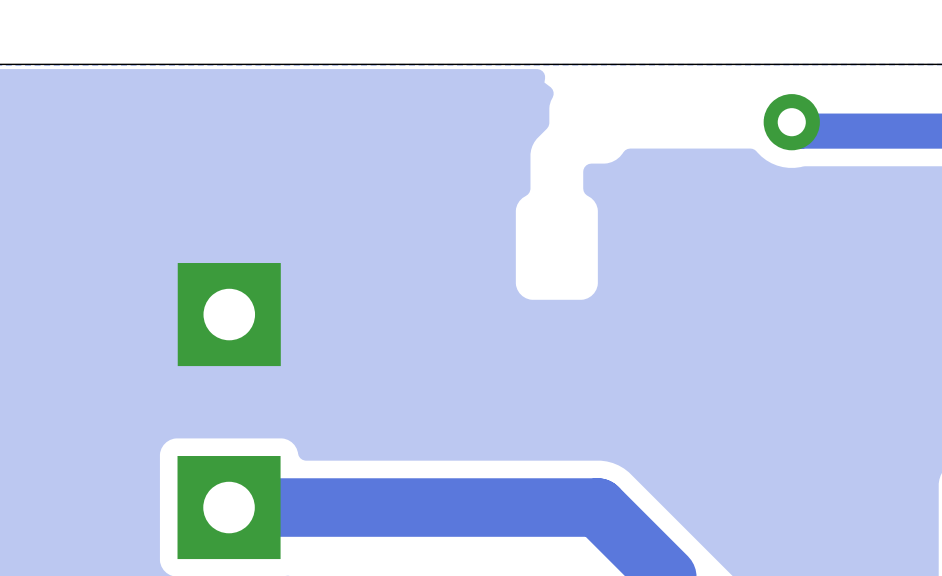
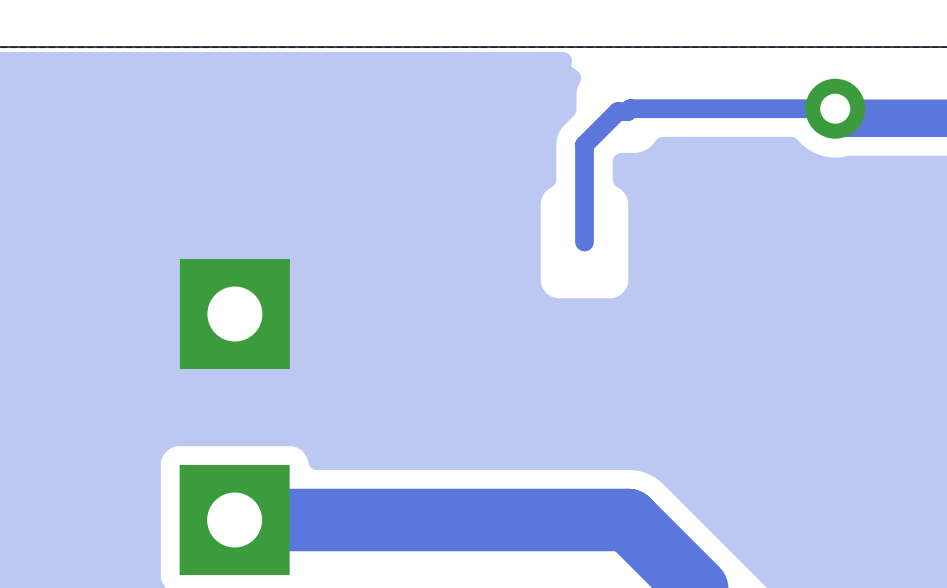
track: none -> (835, 108) (630, 108) (627, 111) (617, 111) (584, 144) (584, 242)

